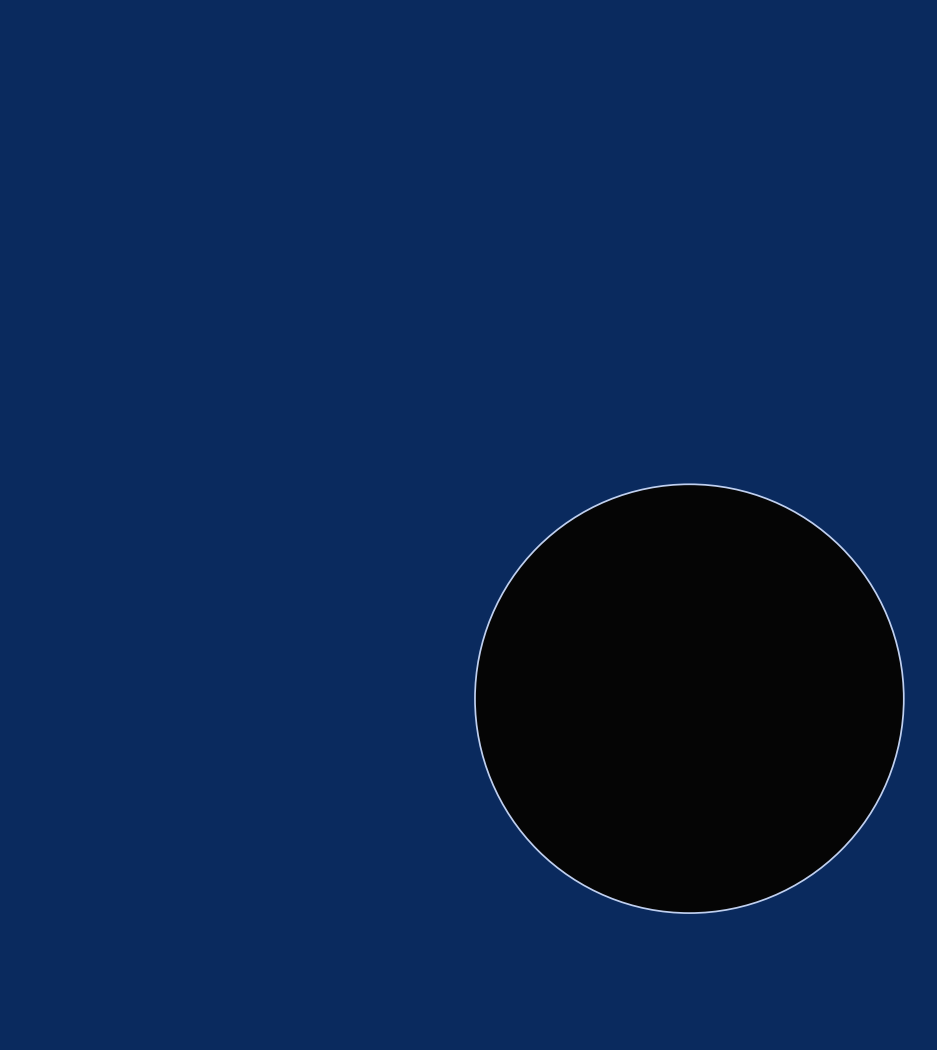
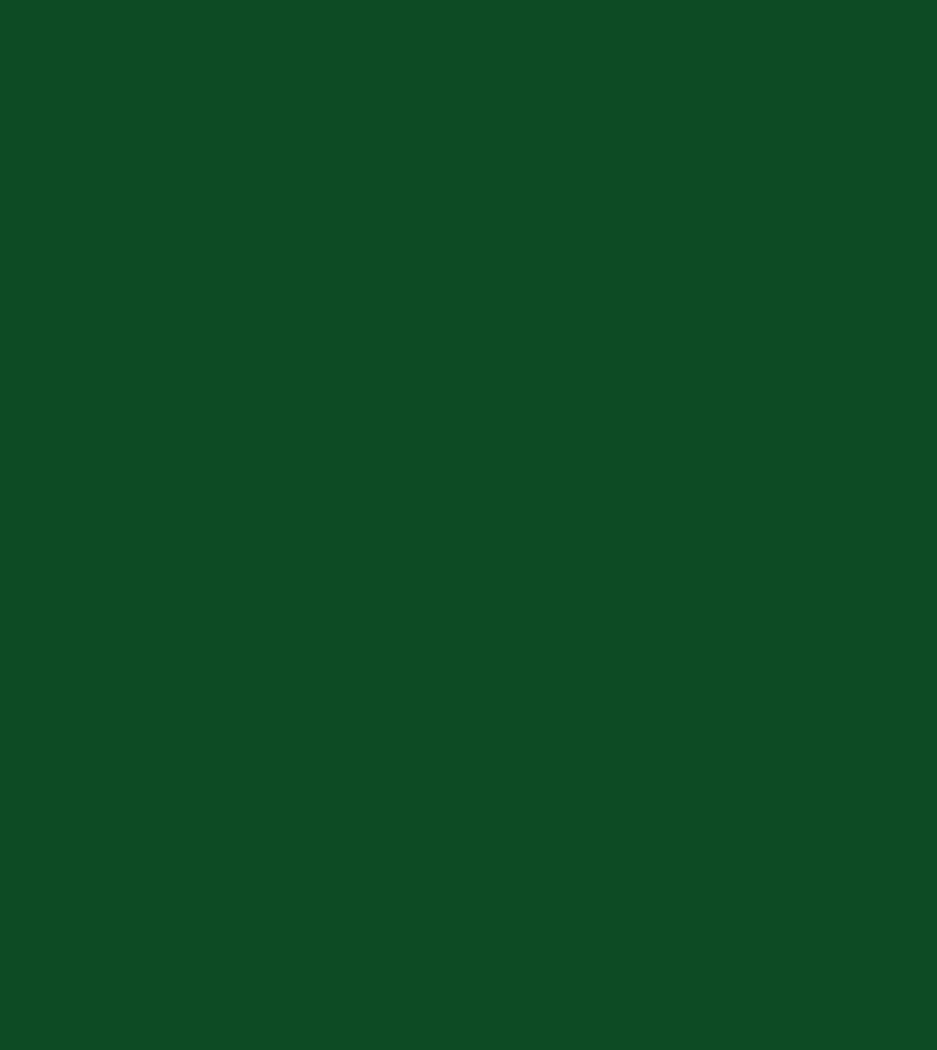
part: (689, 698) -> none

